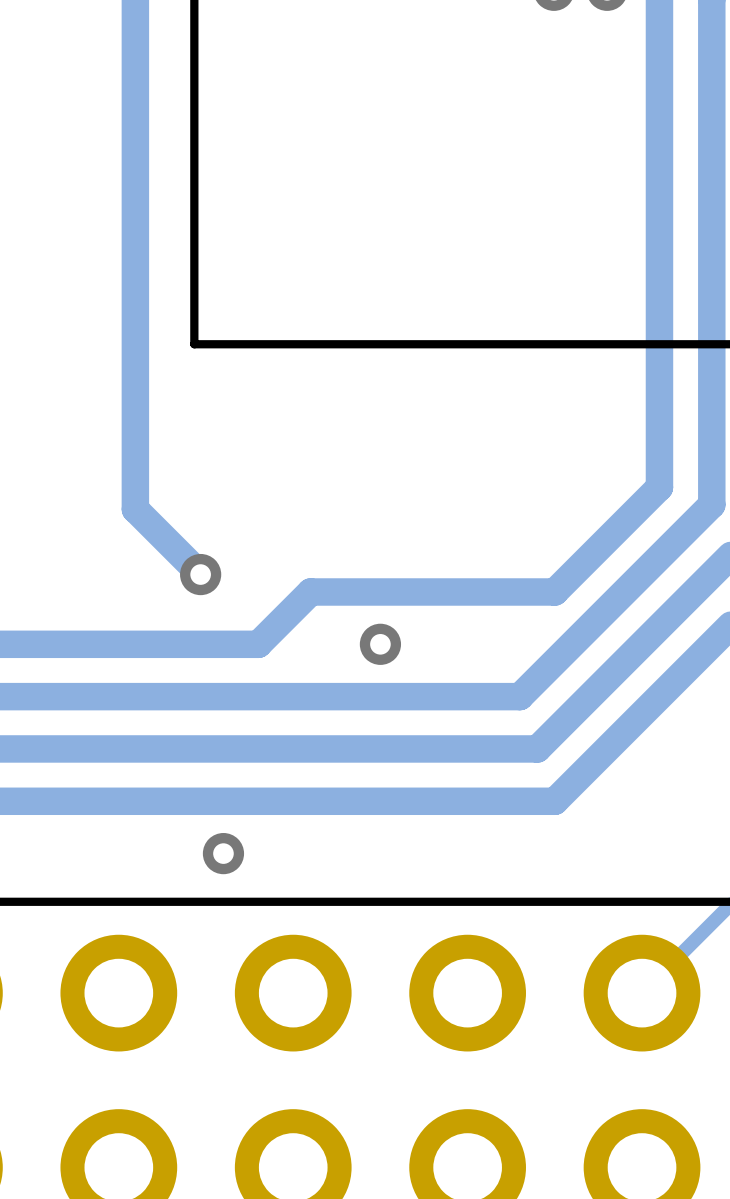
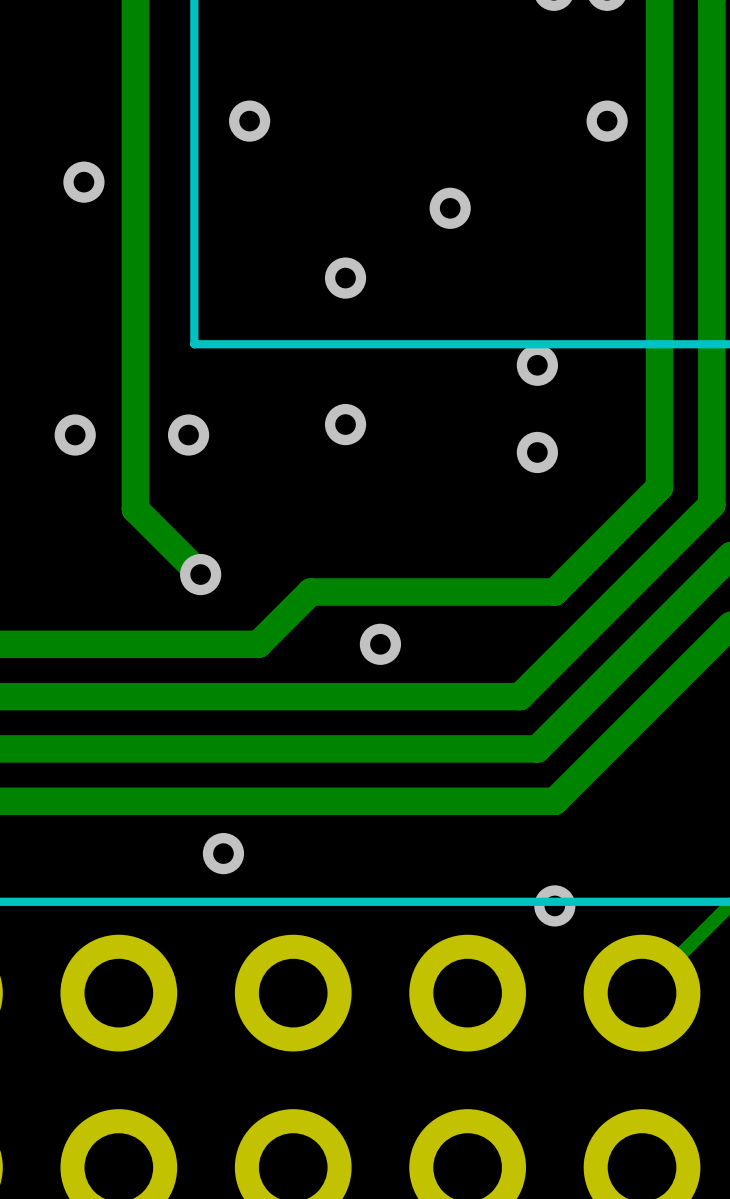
via: none -> (249, 121)
via: none -> (607, 121)
via: none -> (83, 182)
via: none -> (450, 208)
via: none -> (345, 278)
via: none -> (537, 365)
via: none -> (345, 424)
via: none -> (75, 435)
via: none -> (188, 435)
via: none -> (537, 452)
via: none -> (554, 905)

